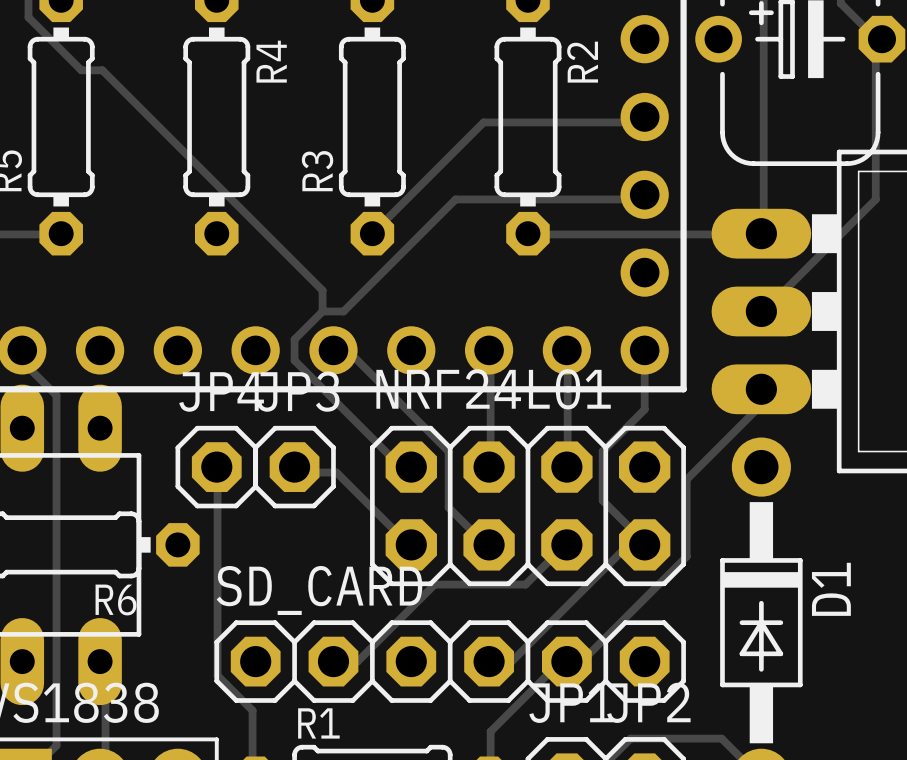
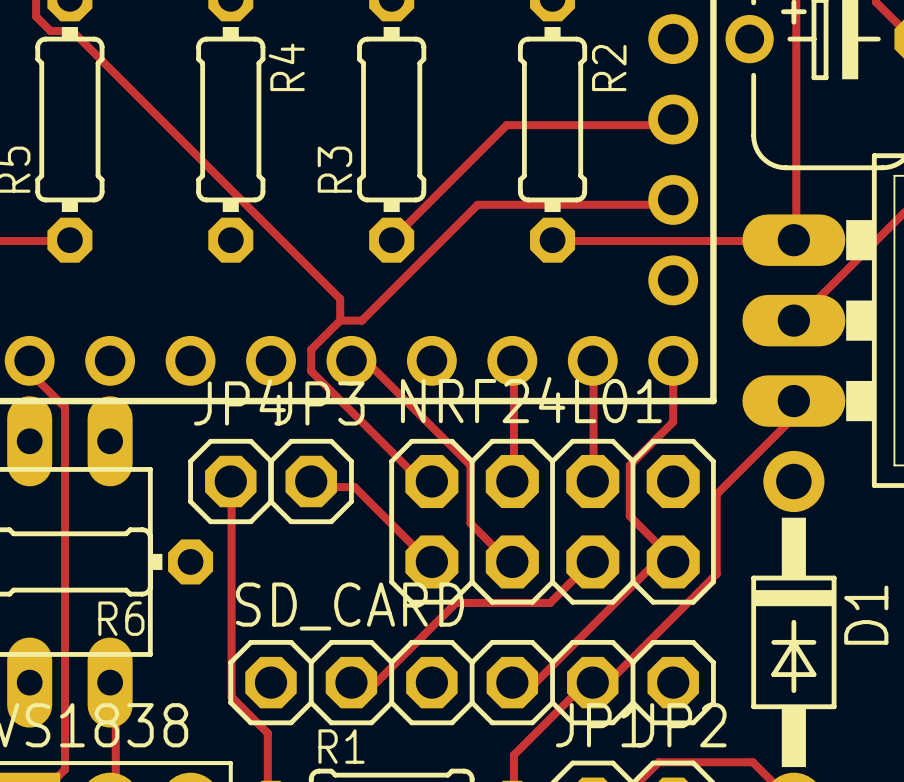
track: (42, 31) (81, 70) (102, 70) -> (50, 31) (72, 31) (112, 71)

